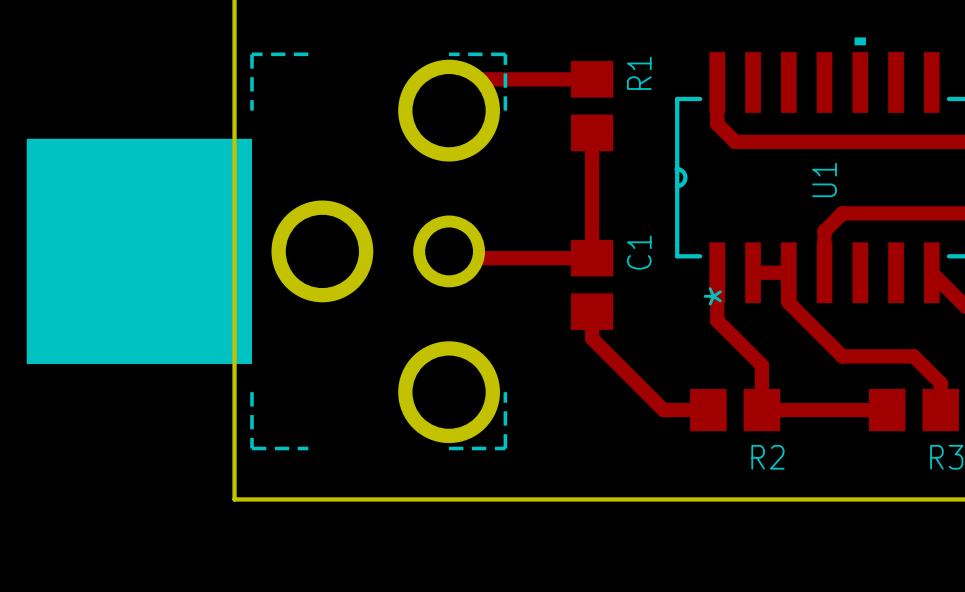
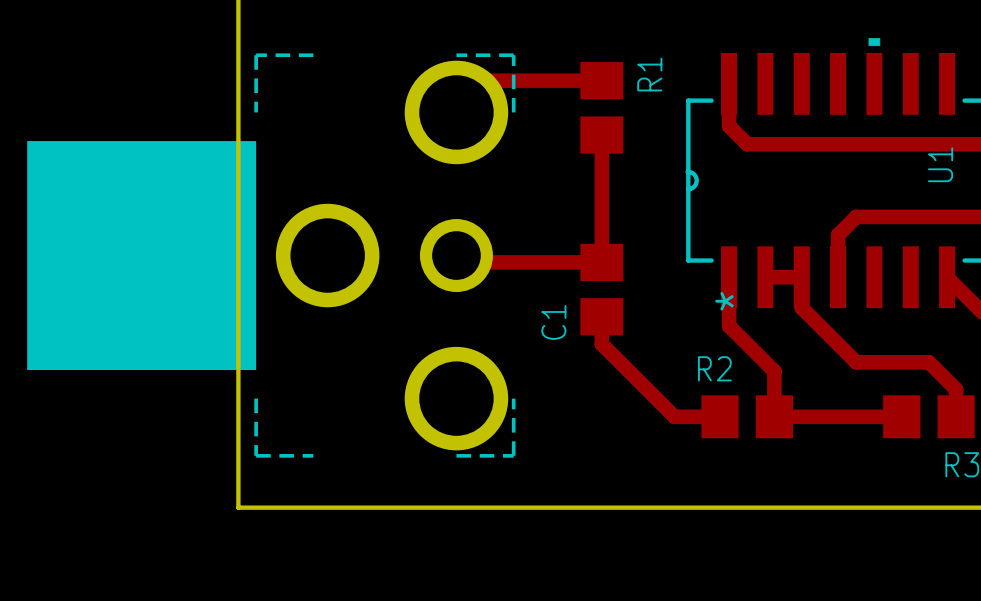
U1 name position: U1 (824, 180) -> U1 (940, 164)
C1 name position: C1 (639, 252) -> C1 (553, 322)
R2 name position: R2 (767, 457) -> R2 (714, 368)

